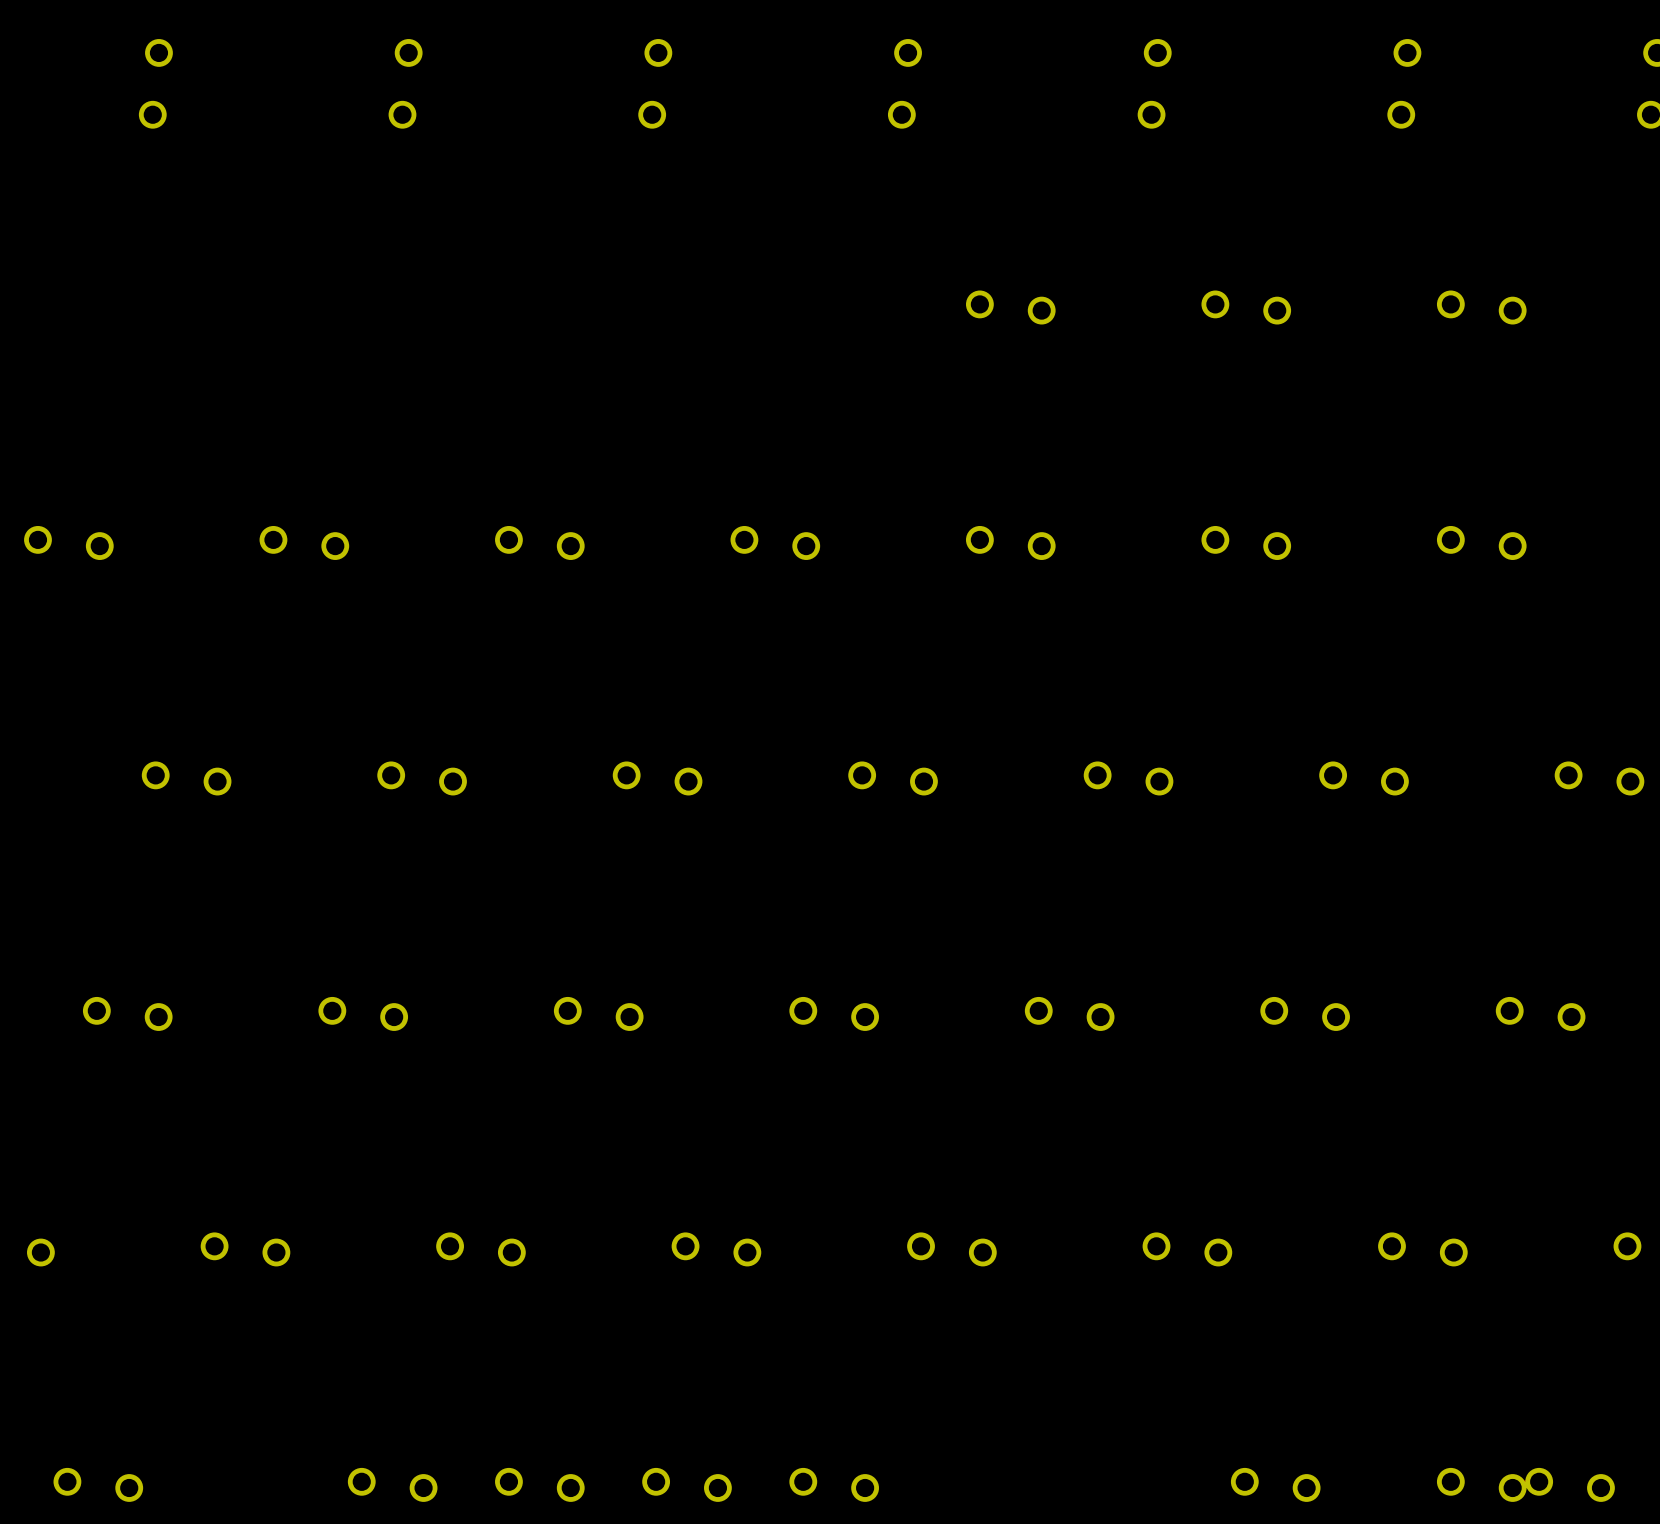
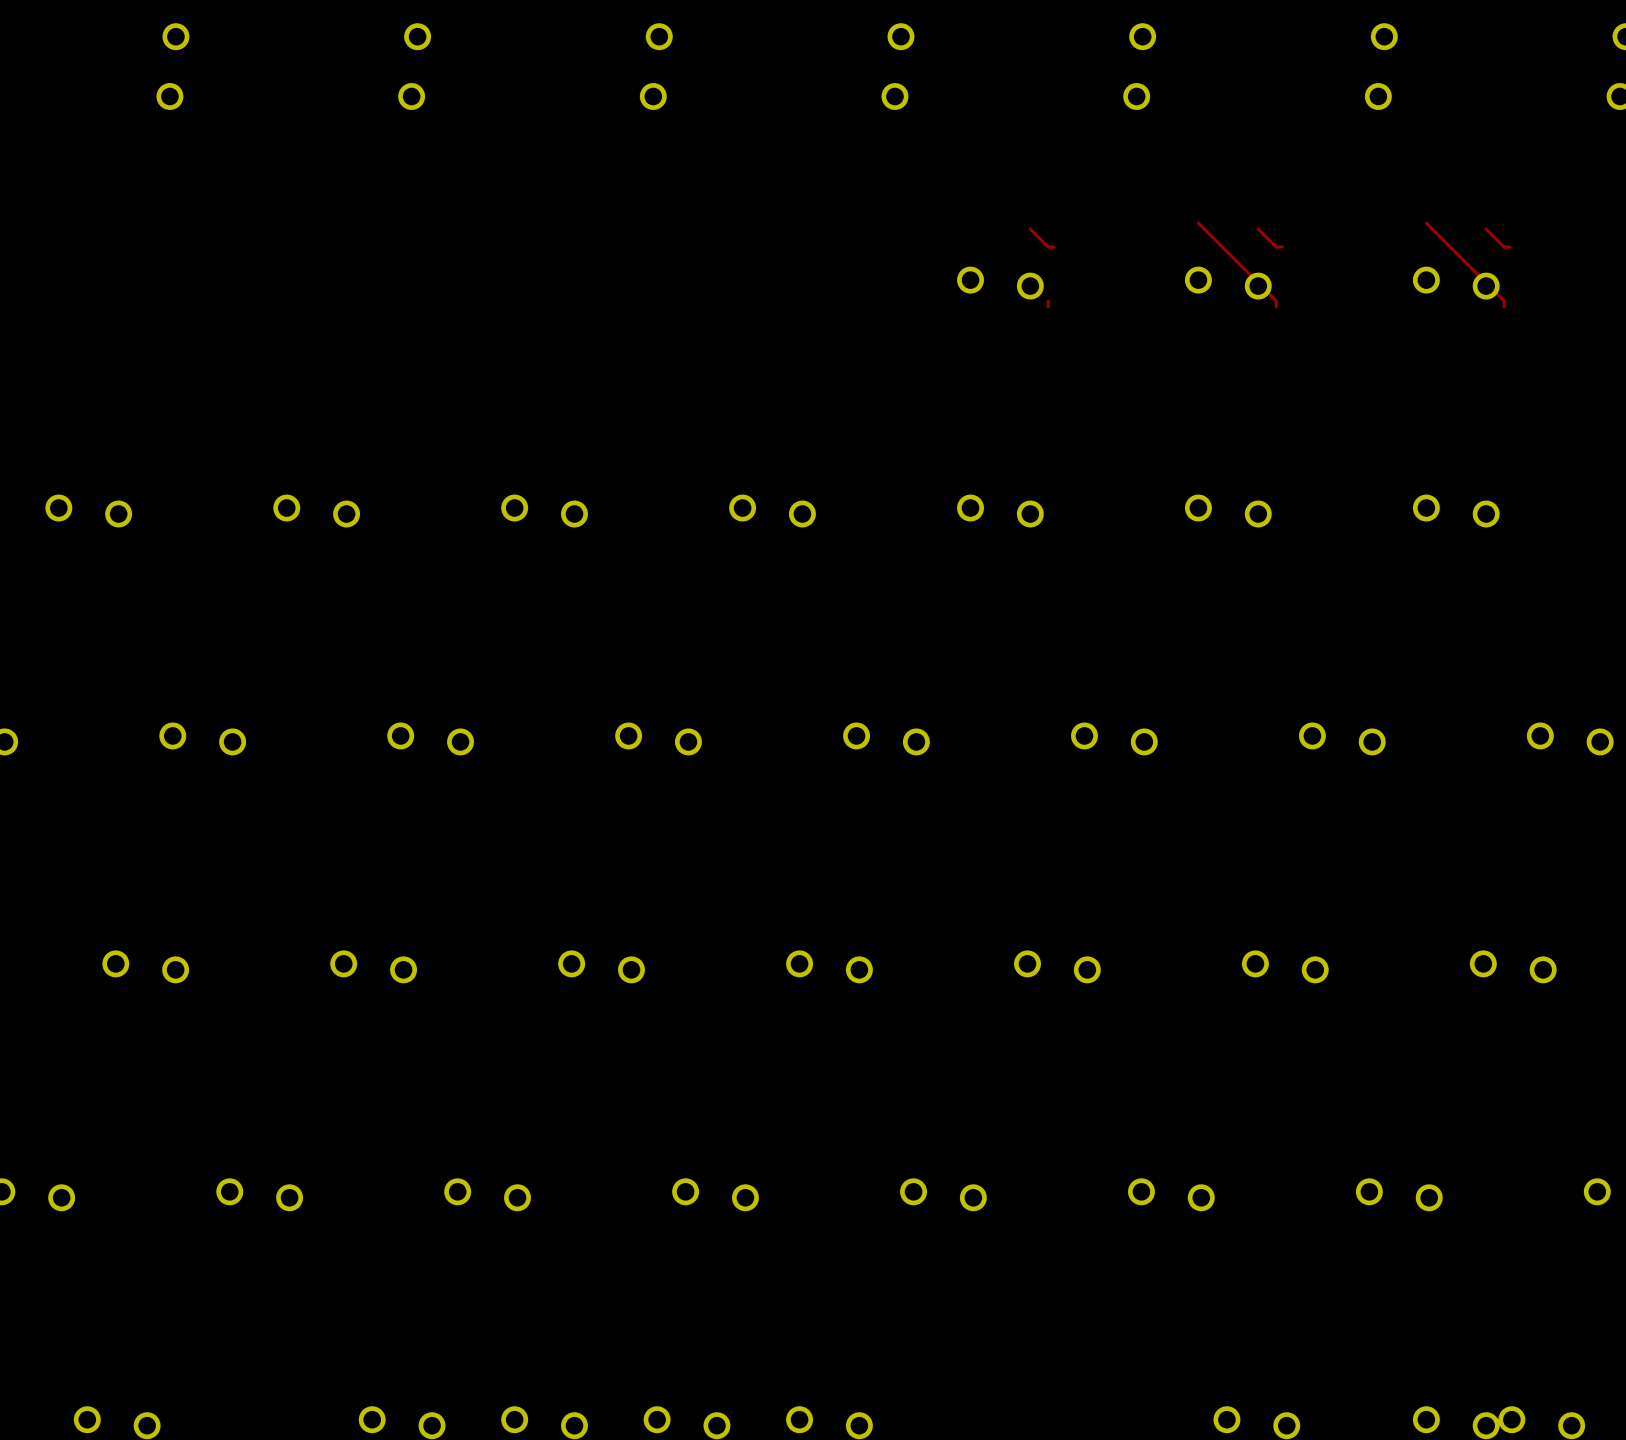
top track: none -> (1198, 223) (1276, 300) (1276, 306)
top track: none -> (1426, 223) (1504, 300) (1504, 306)
top track: none -> (1030, 229) (1048, 247) (1054, 247)
top track: none -> (1258, 229) (1276, 247) (1282, 247)
top track: none -> (1486, 229) (1504, 247) (1510, 247)
top track: none -> (1048, 300) (1048, 306)

